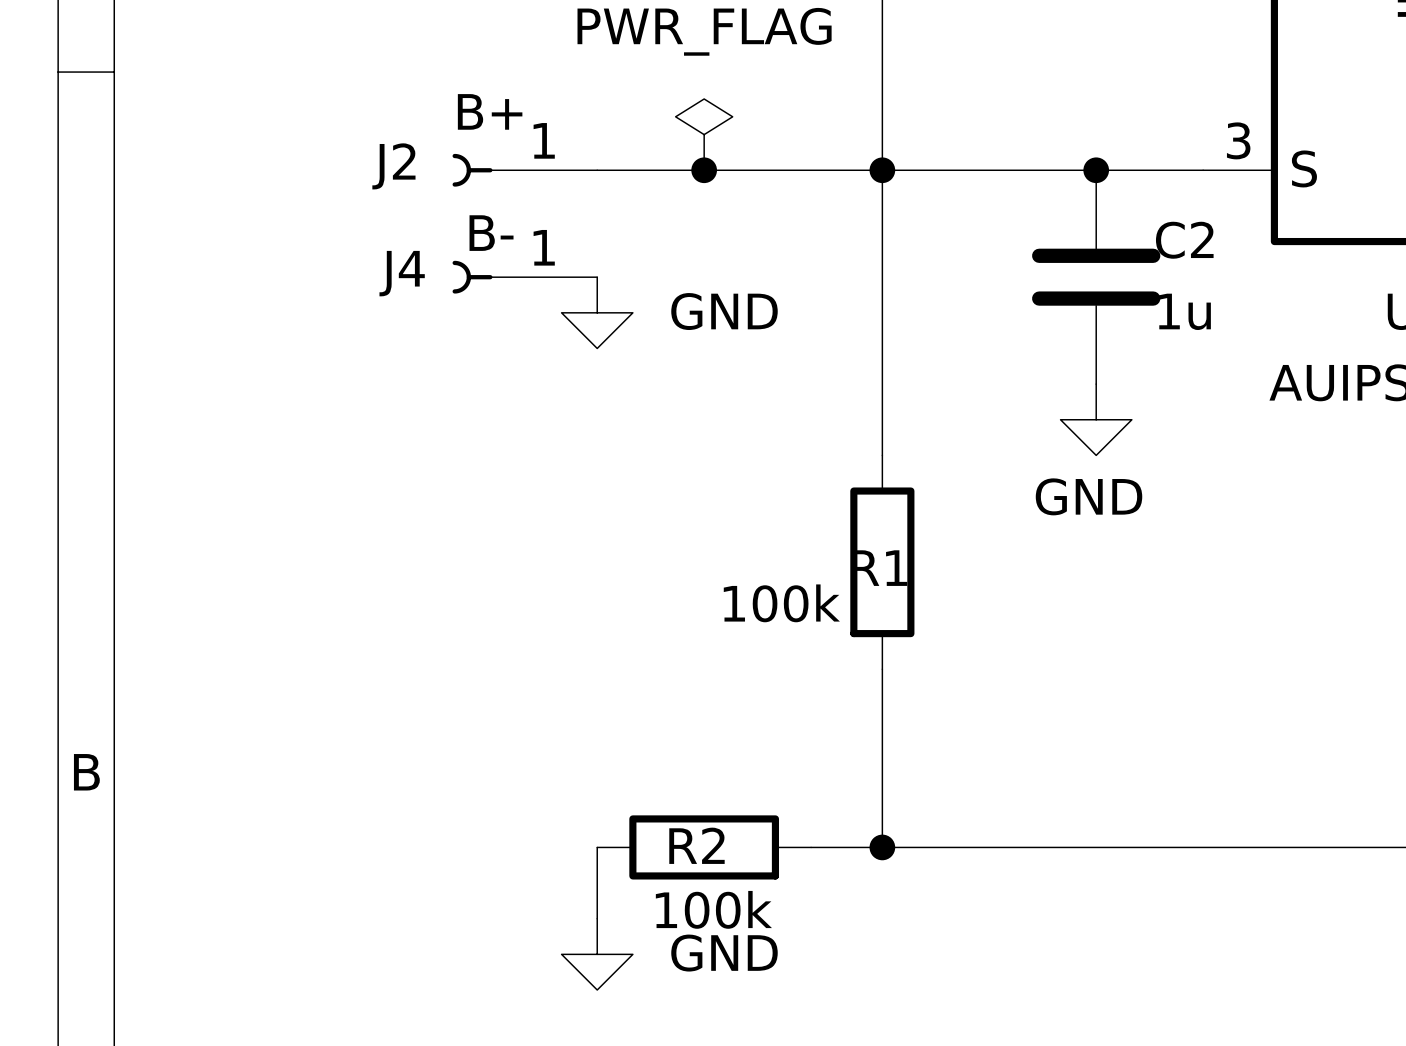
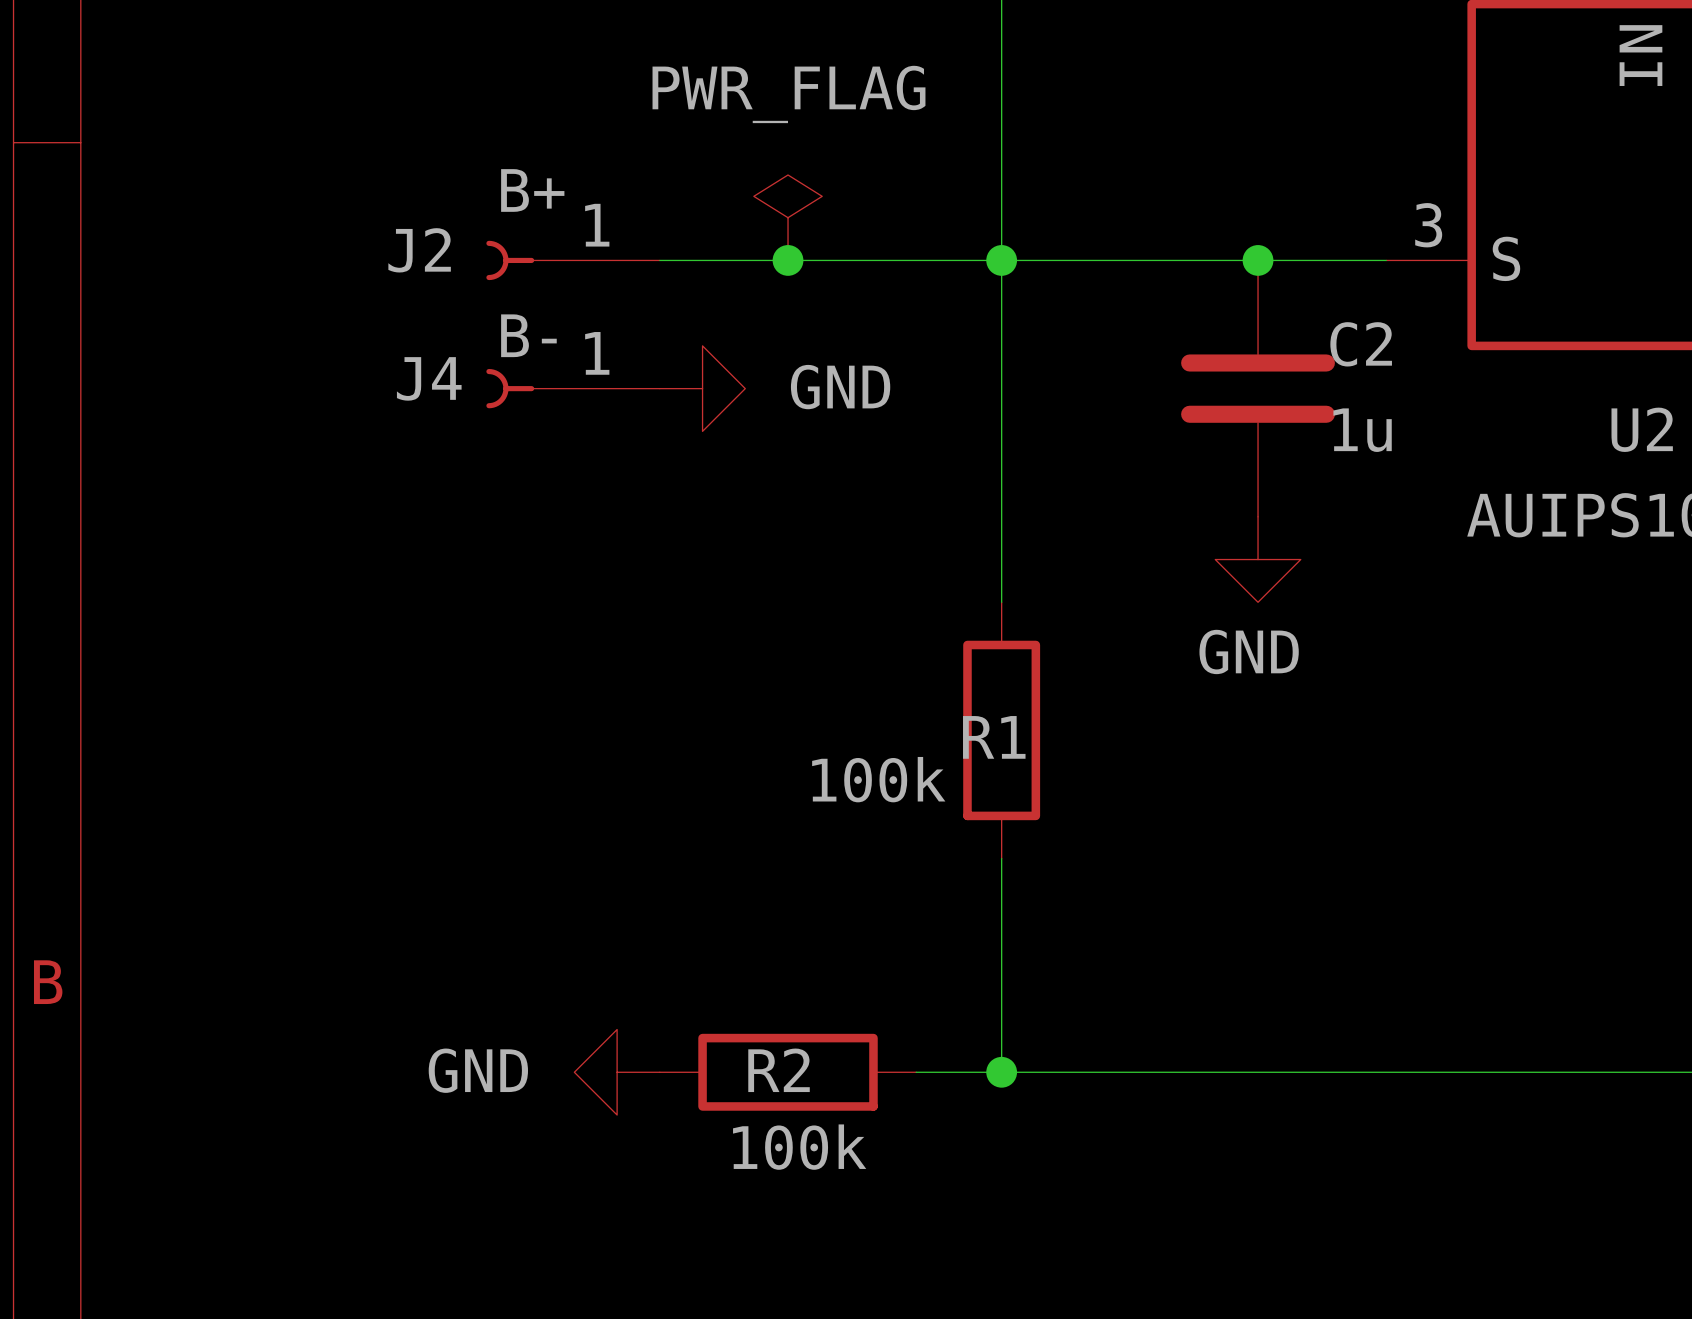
power symbol rotation: 0° (597, 312) -> 90° counterclockwise (702, 388)
power symbol position: GND (597, 312) -> GND (702, 388)
wire: (597, 847) (597, 918) -> none
power symbol text position: GND (724, 953) -> GND (478, 1070)
power symbol rotation: 0° (597, 954) -> 90° clockwise (617, 1072)
power symbol position: GND (597, 954) -> GND (617, 1072)

